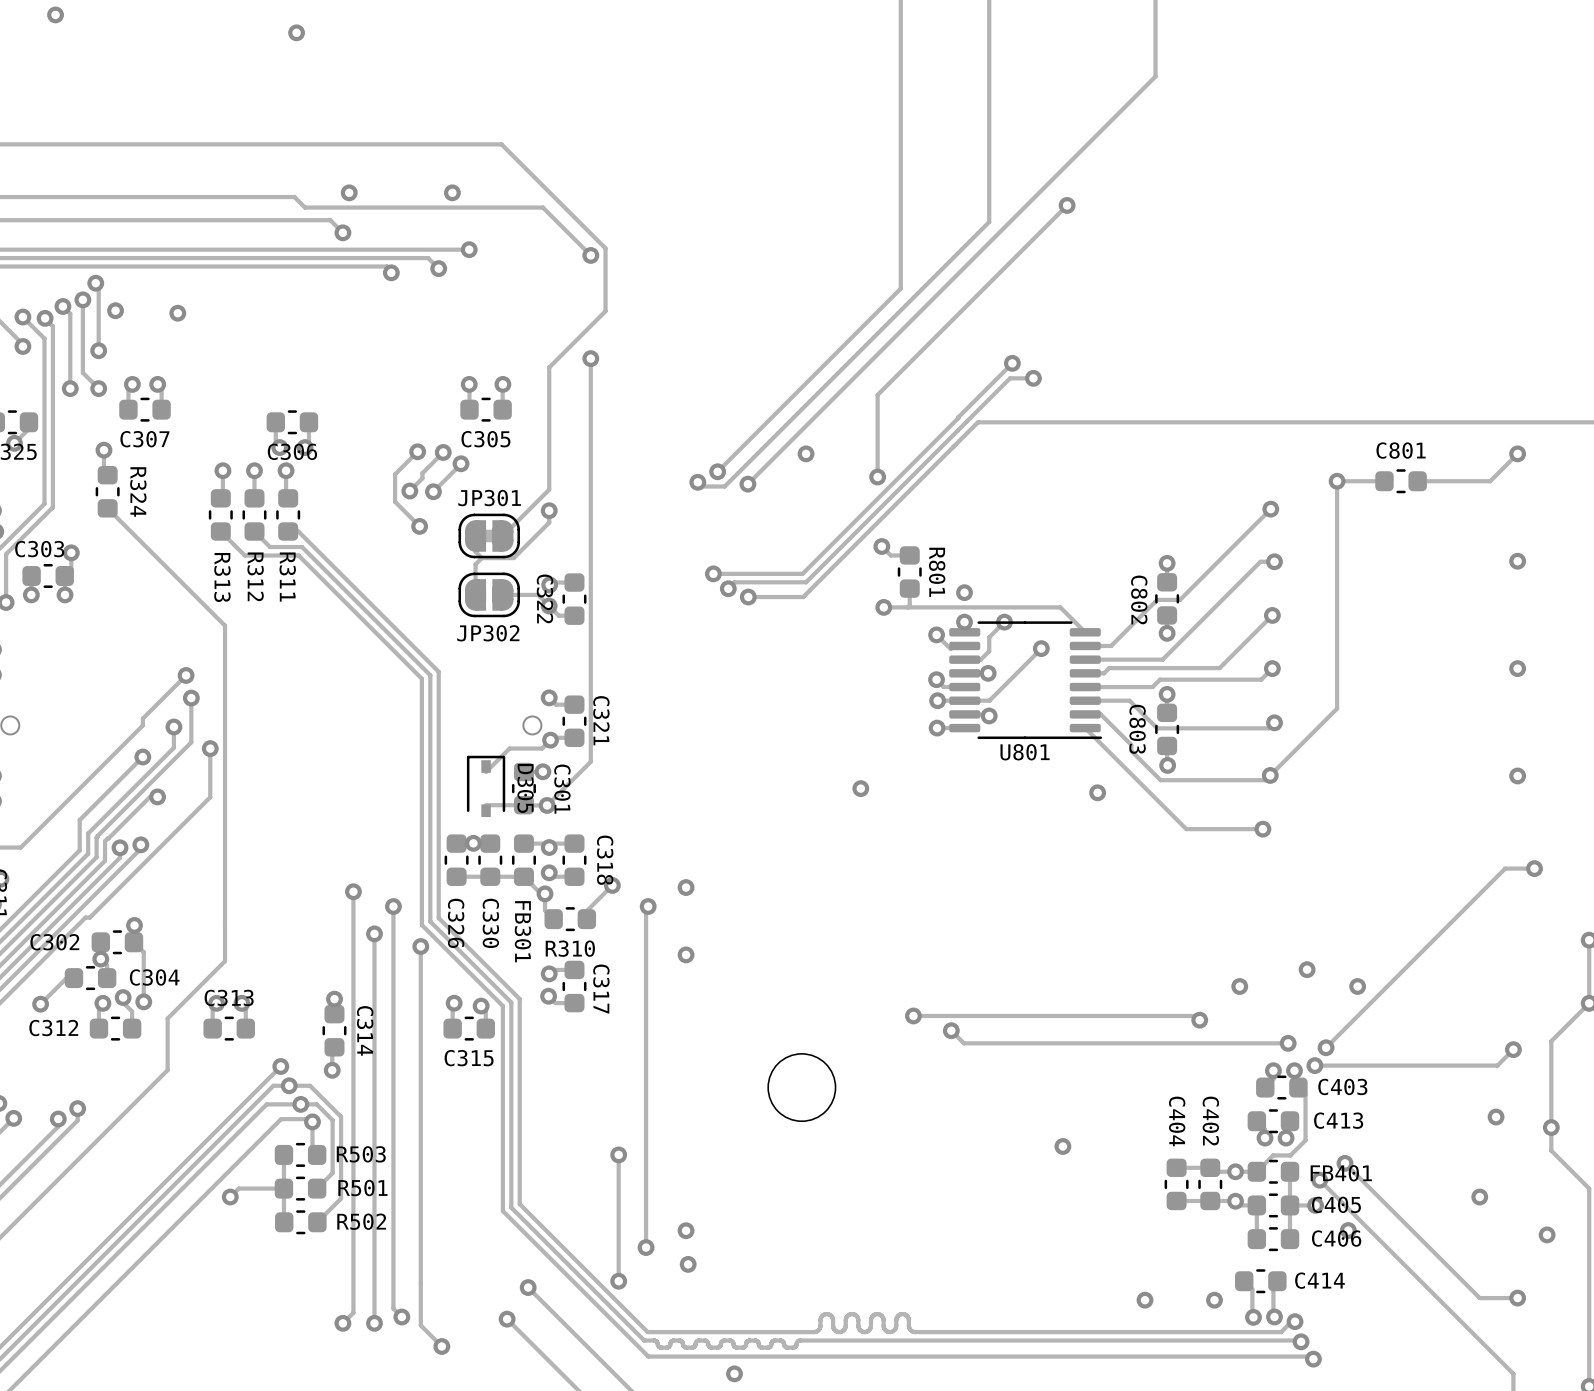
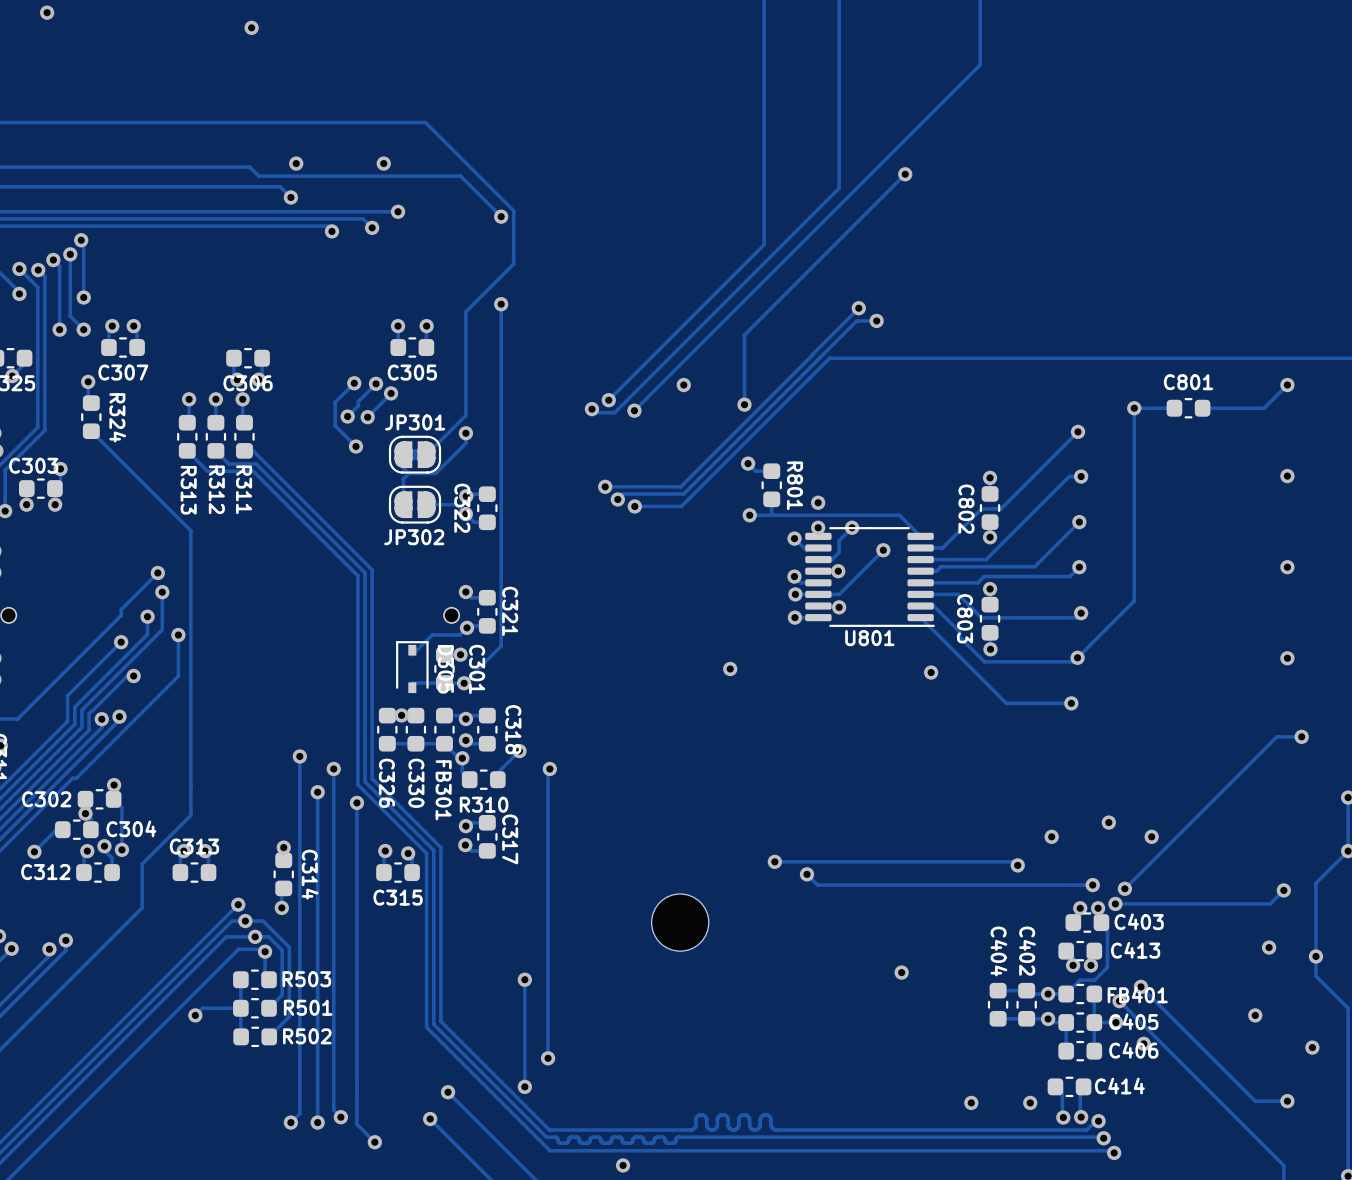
via: (115, 310) -> none
via: (177, 313) -> none
via: (686, 887) -> none
via: (686, 954) -> none
via: (686, 1230) -> none
via: (688, 1264) -> none

